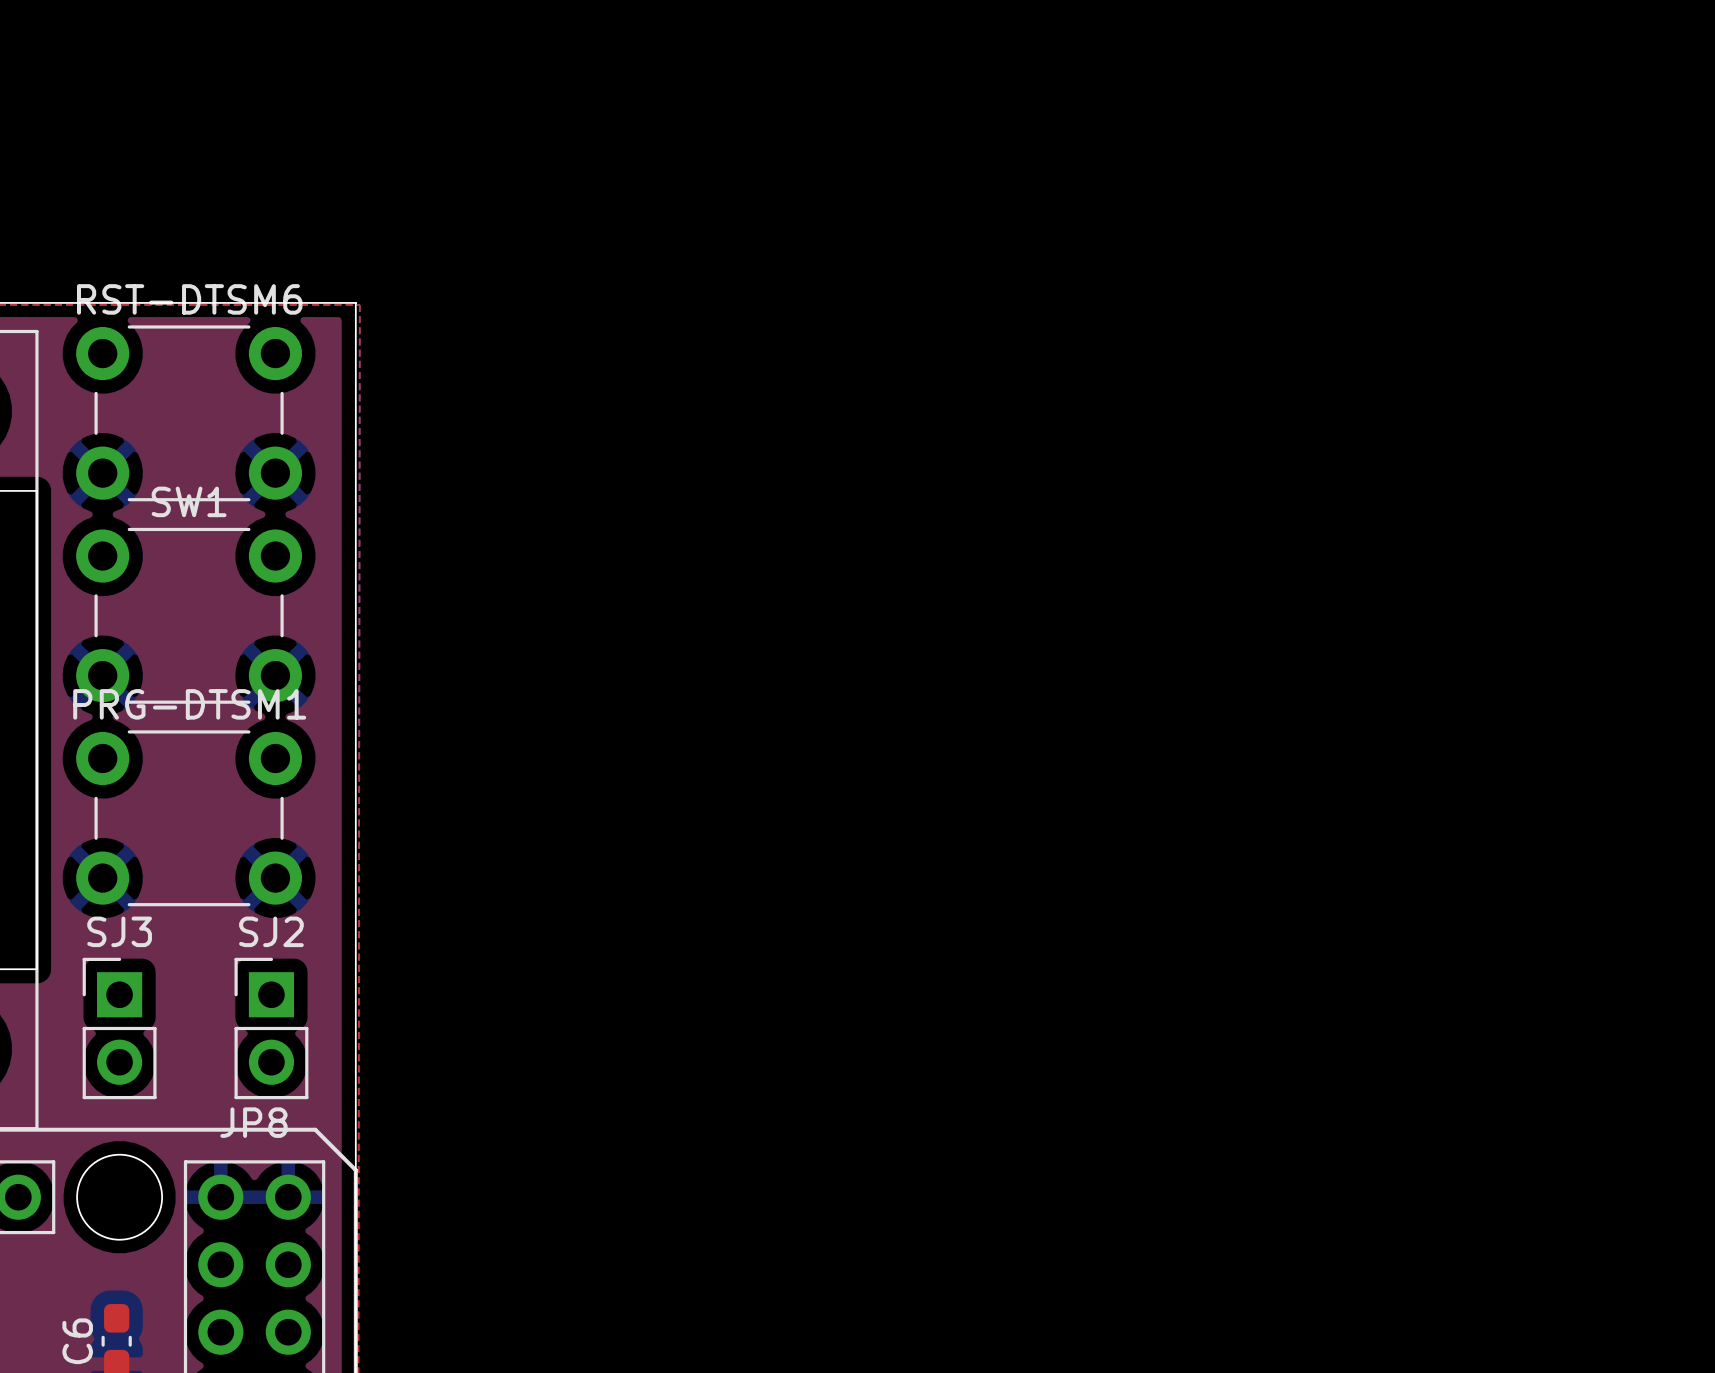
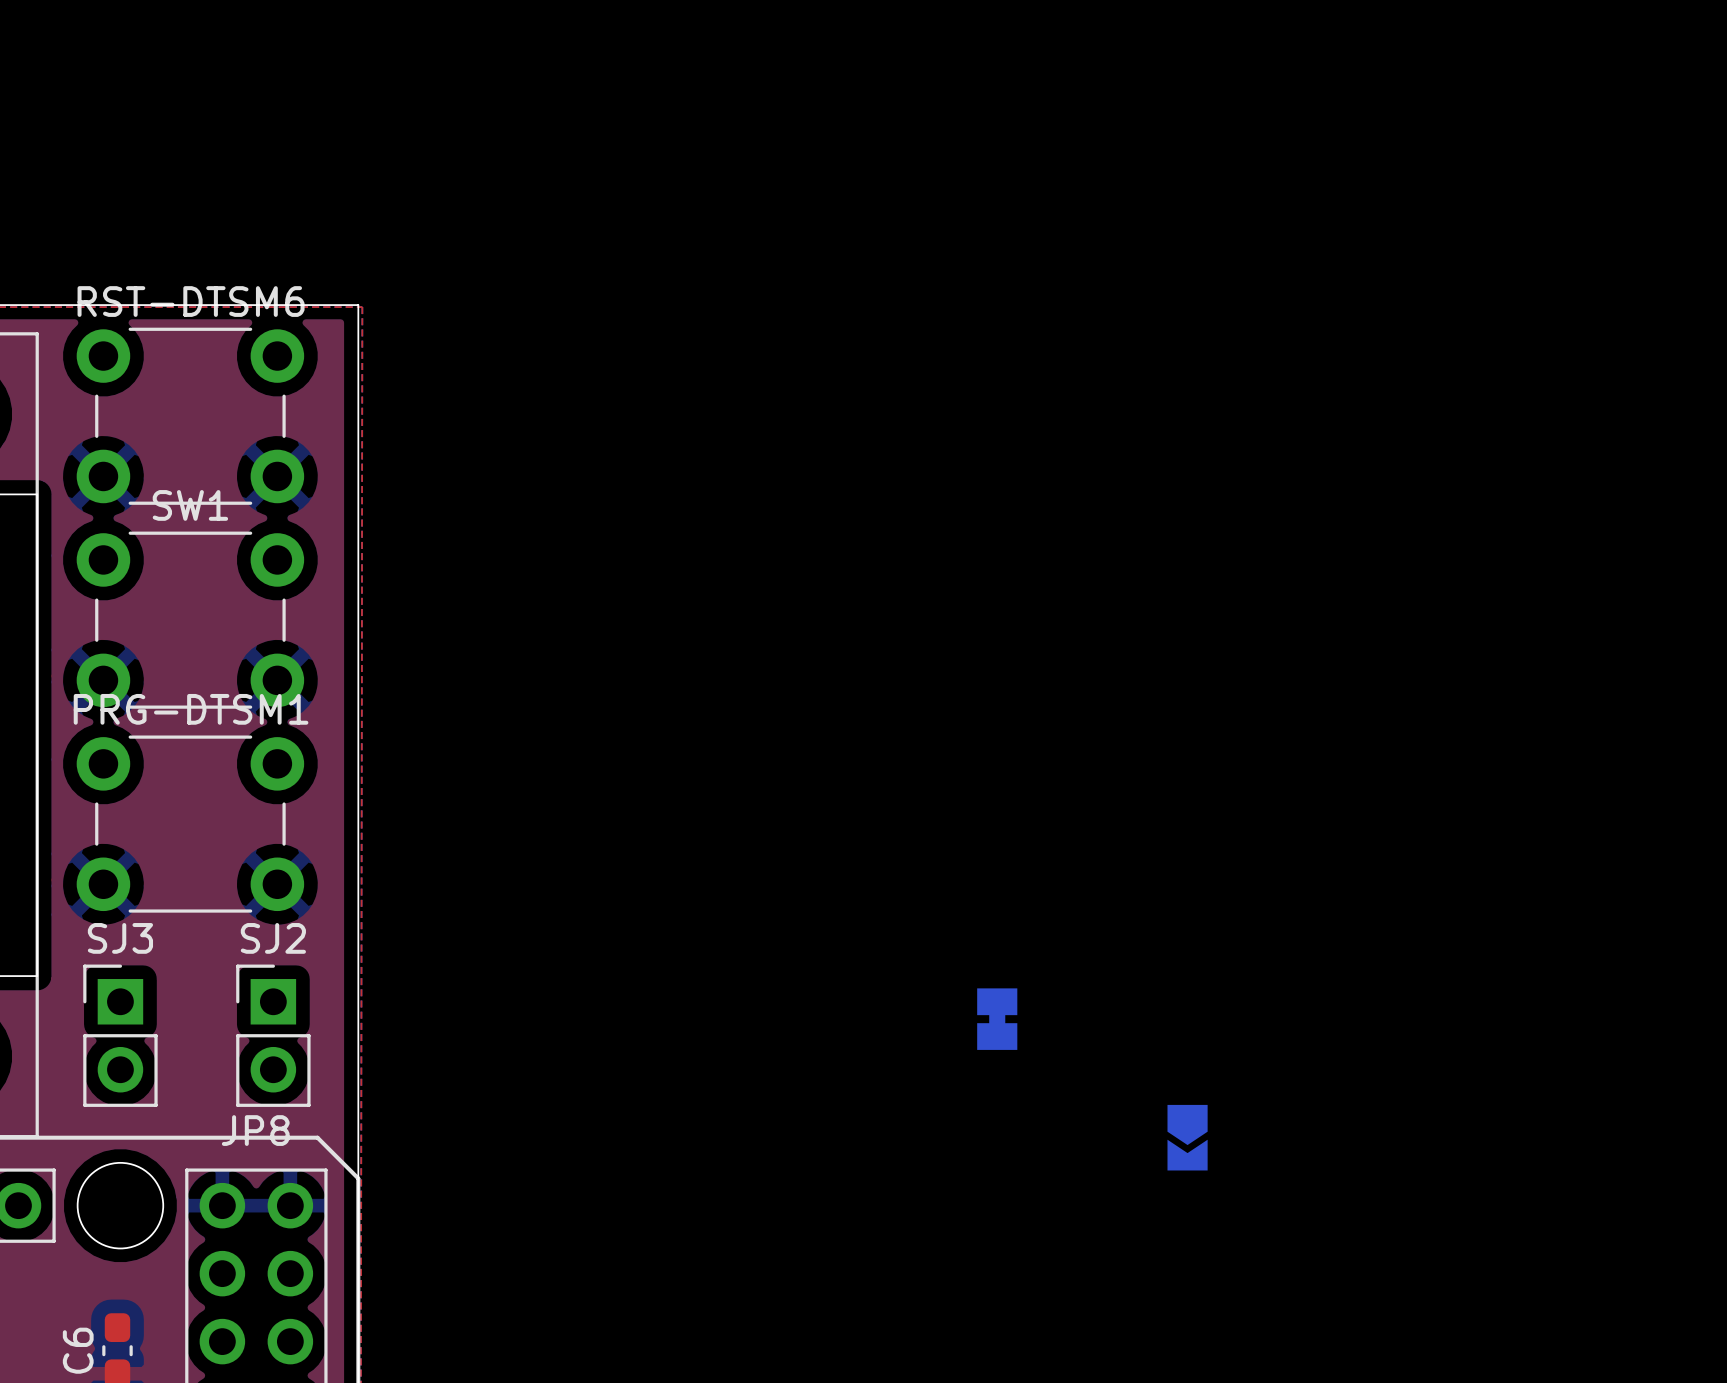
part: none -> (997, 1019)
part: none -> (1187, 1137)

